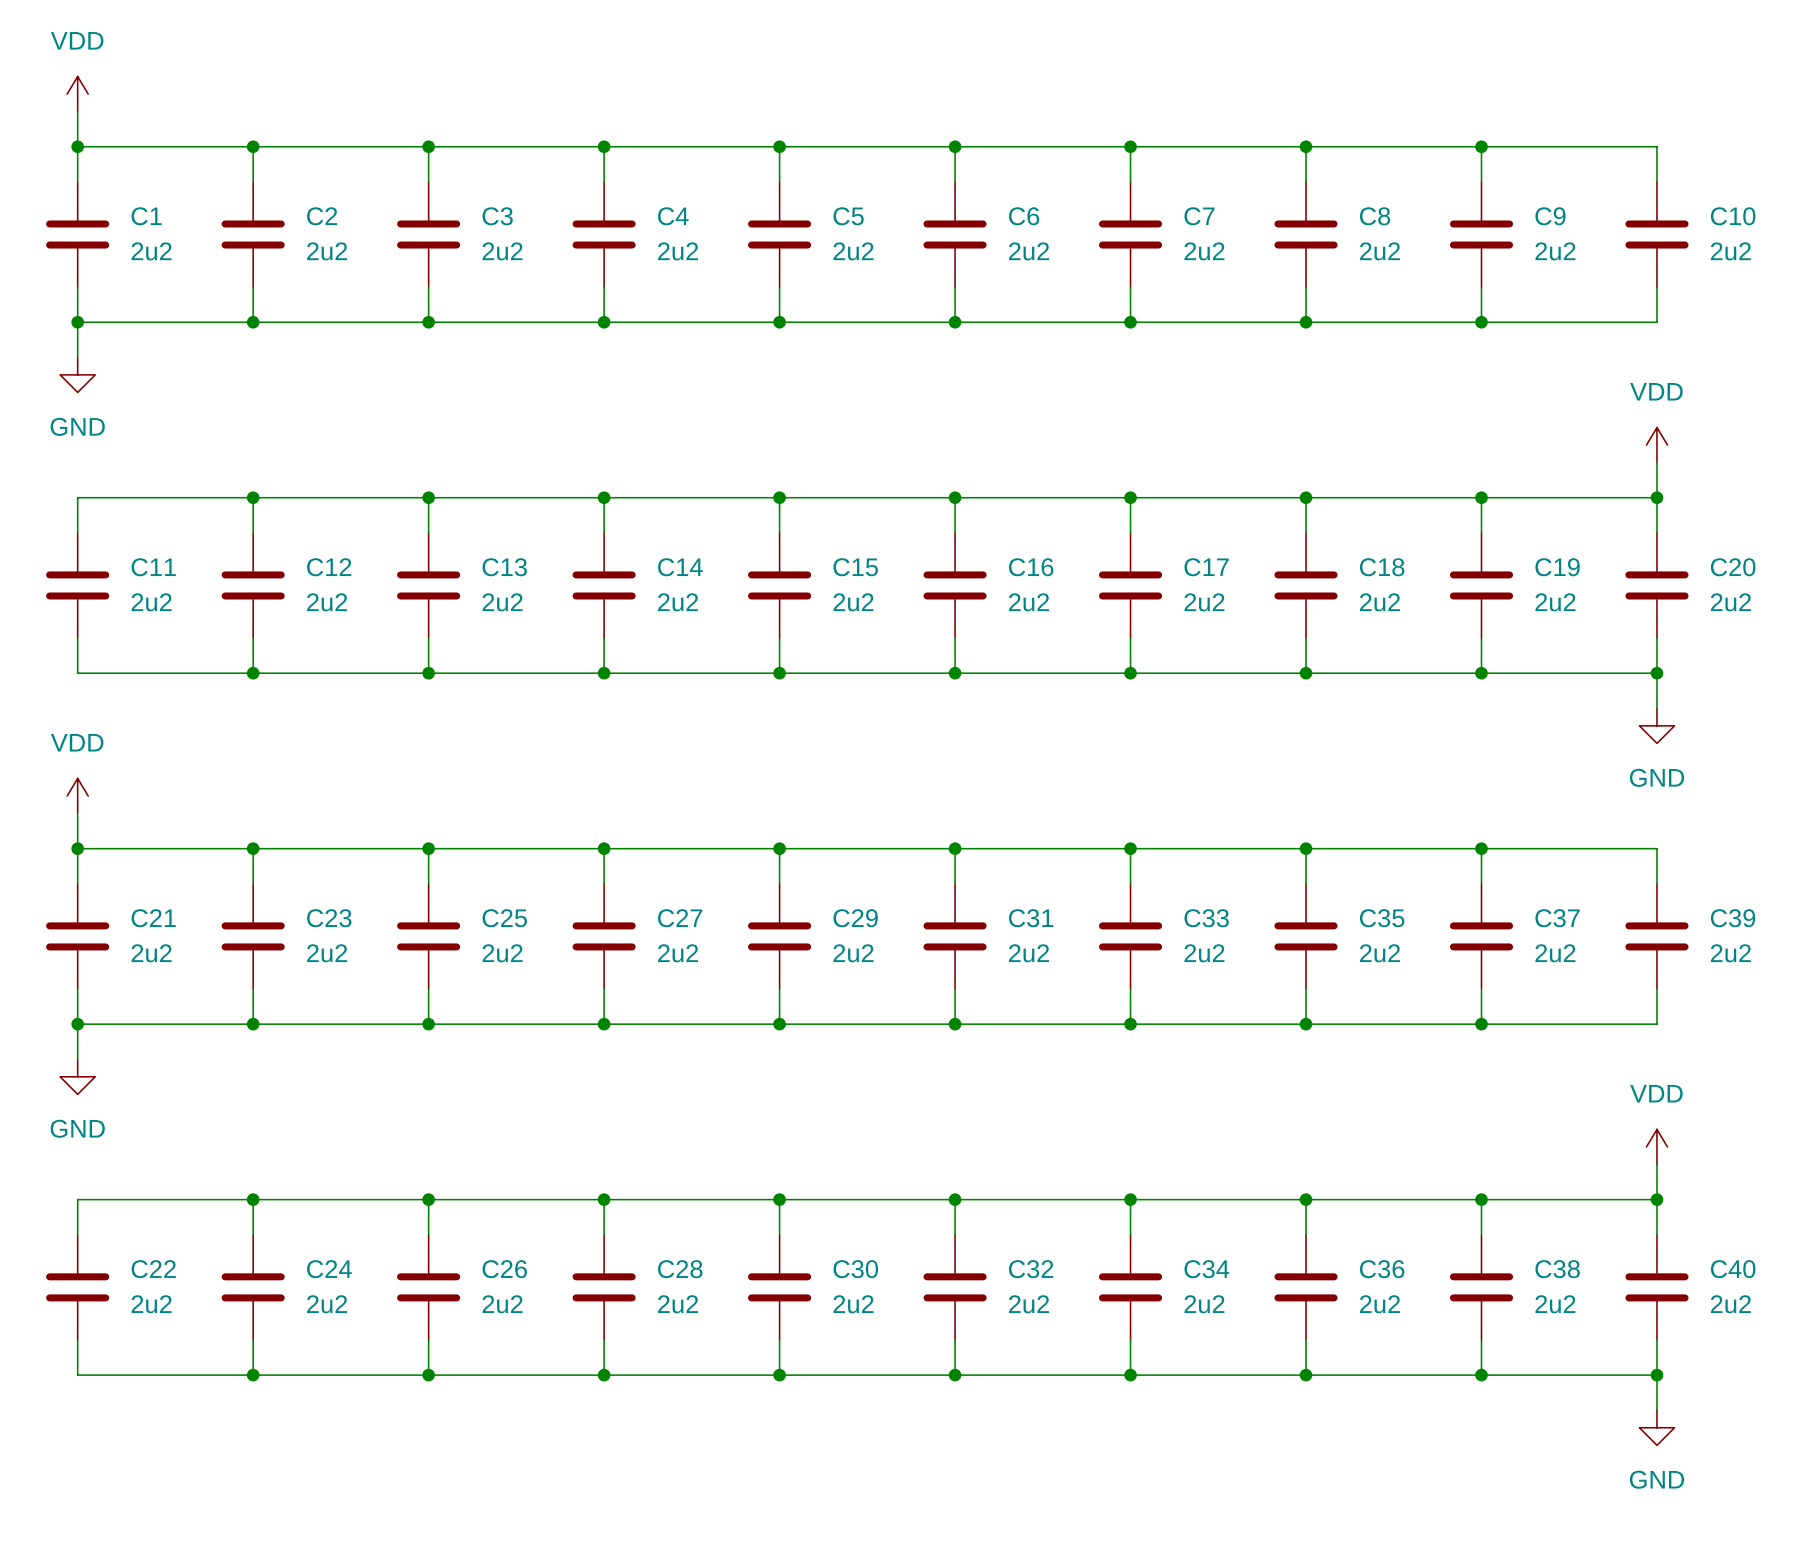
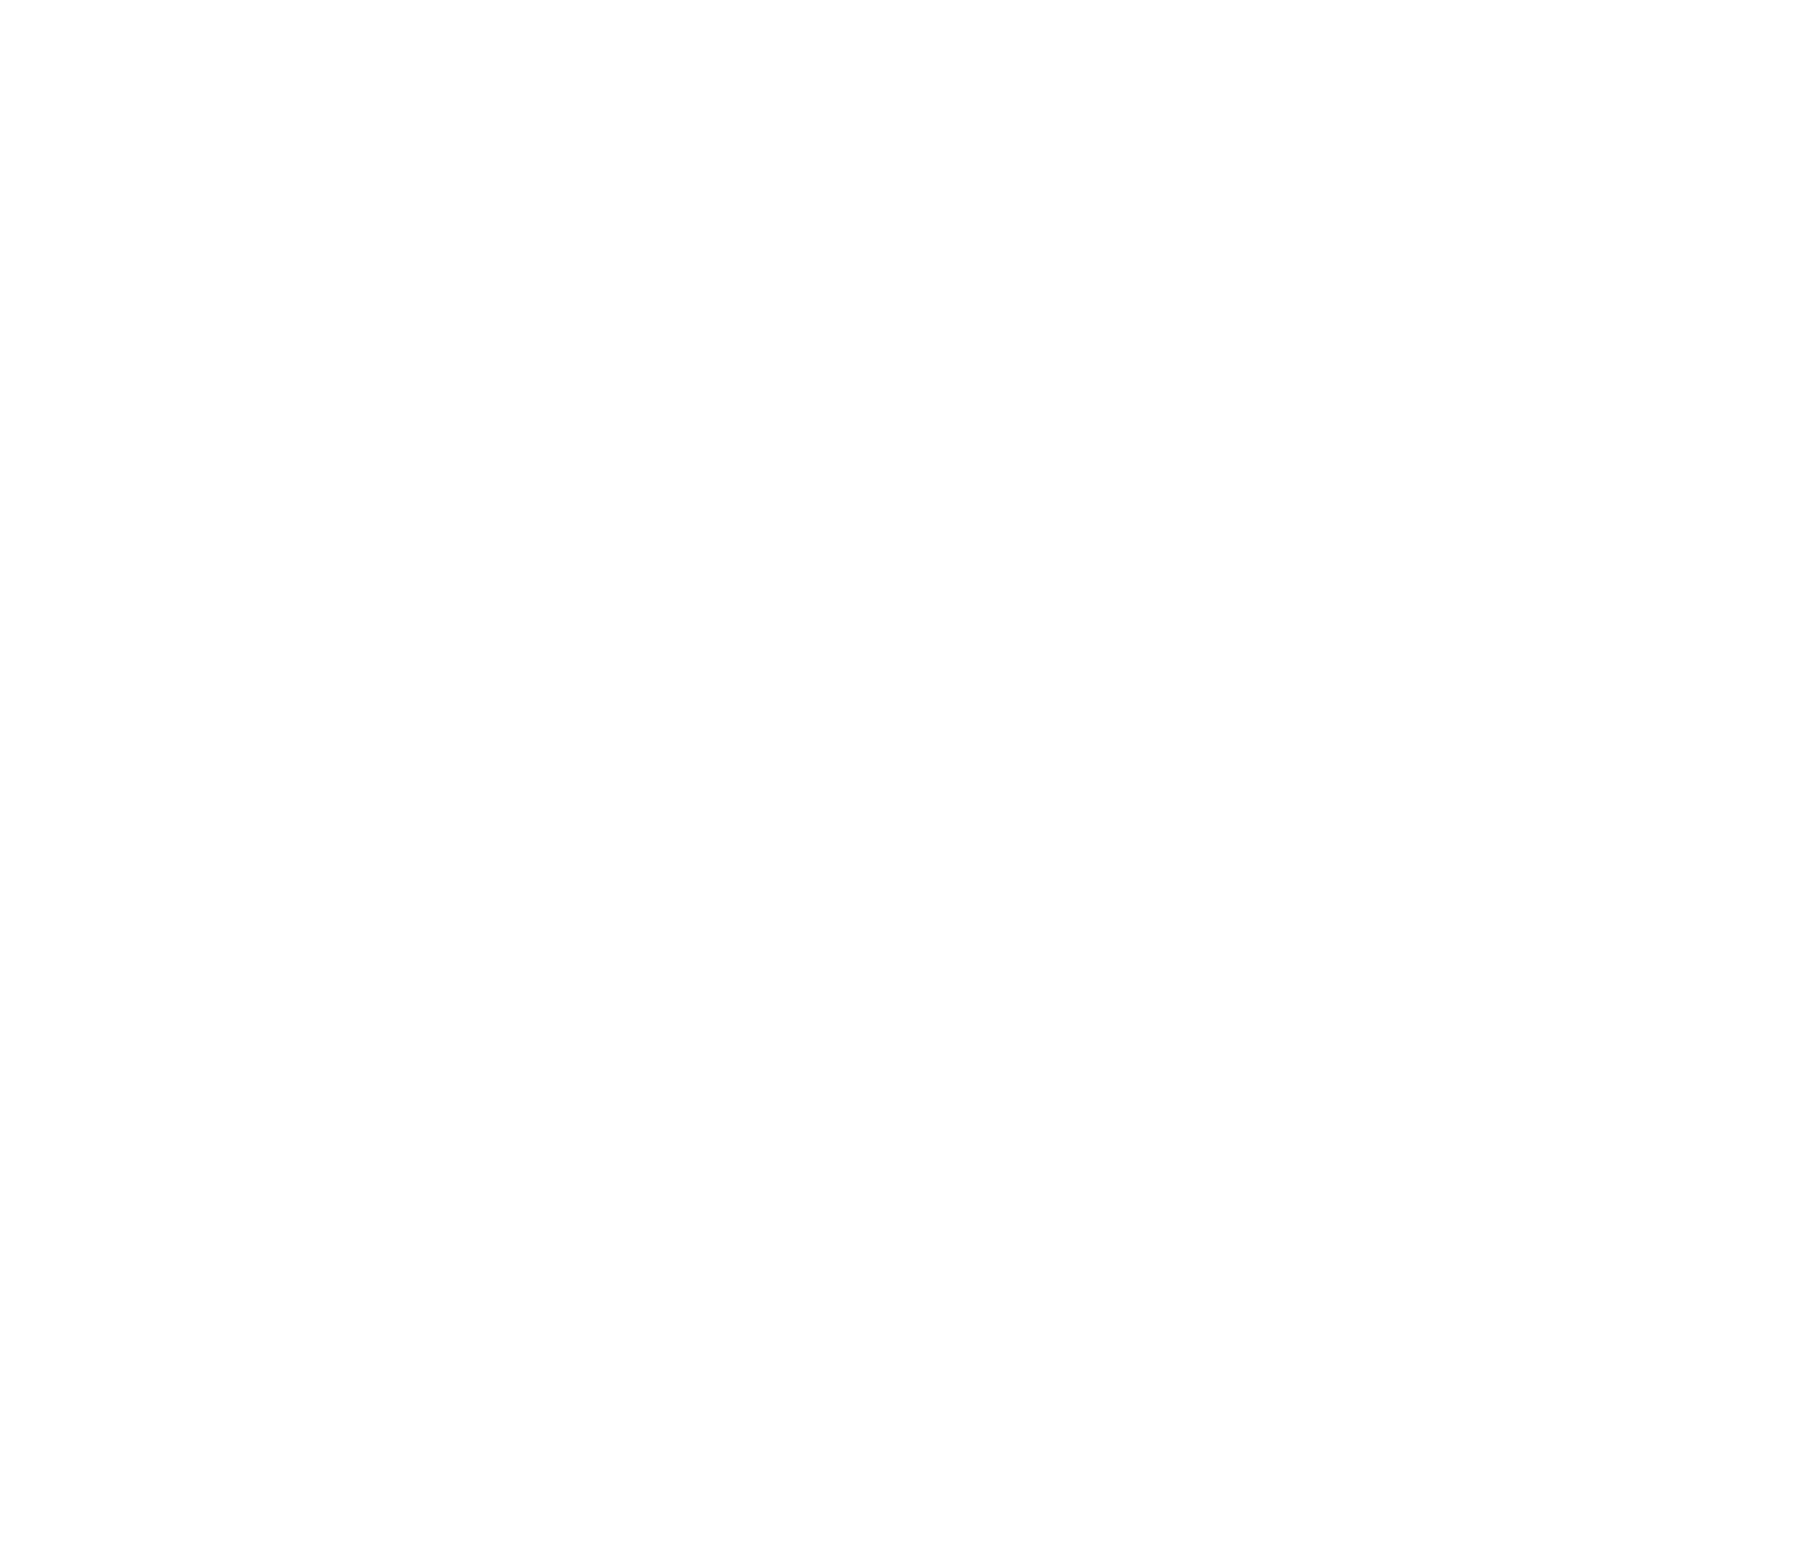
power symbol: VDD (77, 94) -> none
wire: (77, 111) (77, 181) -> none
wire: (77, 146) (1656, 146) (1656, 181) -> none
junction: (77, 146) -> none
wire: (253, 146) (253, 181) -> none
junction: (253, 146) -> none
wire: (428, 146) (428, 181) -> none
junction: (428, 146) -> none
wire: (604, 146) (604, 181) -> none
junction: (604, 146) -> none
wire: (779, 146) (779, 181) -> none
junction: (779, 146) -> none
wire: (955, 146) (955, 181) -> none
junction: (955, 146) -> none
wire: (1130, 146) (1130, 181) -> none
junction: (1130, 146) -> none
wire: (1306, 146) (1306, 181) -> none
junction: (1306, 146) -> none
wire: (1481, 146) (1481, 181) -> none
junction: (1481, 146) -> none
C1: 2u2 (77, 234) -> none
C2: 2u2 (253, 234) -> none
C3: 2u2 (428, 234) -> none
C4: 2u2 (604, 234) -> none
C5: 2u2 (779, 234) -> none
C6: 2u2 (955, 234) -> none
C7: 2u2 (1130, 234) -> none
C8: 2u2 (1306, 234) -> none
C9: 2u2 (1481, 234) -> none
C10: 2u2 (1656, 234) -> none
wire: (77, 287) (77, 357) -> none
wire: (253, 287) (253, 322) -> none
wire: (428, 287) (428, 322) -> none
wire: (604, 287) (604, 322) -> none
wire: (779, 287) (779, 322) -> none
wire: (955, 287) (955, 322) -> none
wire: (1130, 287) (1130, 322) -> none
wire: (1306, 287) (1306, 322) -> none
wire: (1481, 287) (1481, 322) -> none
wire: (1656, 287) (1656, 322) (77, 322) -> none
junction: (77, 322) -> none
junction: (253, 322) -> none
junction: (428, 322) -> none
junction: (604, 322) -> none
junction: (779, 322) -> none
junction: (955, 322) -> none
junction: (1130, 322) -> none
junction: (1306, 322) -> none
junction: (1481, 322) -> none
power symbol: GND (77, 374) -> none
power symbol: VDD (1656, 445) -> none
wire: (1656, 462) (1656, 532) -> none
wire: (253, 497) (253, 532) -> none
junction: (253, 497) -> none
wire: (428, 497) (428, 532) -> none
junction: (428, 497) -> none
wire: (604, 497) (604, 532) -> none
junction: (604, 497) -> none
wire: (779, 497) (779, 532) -> none
junction: (779, 497) -> none
wire: (955, 497) (955, 532) -> none
junction: (955, 497) -> none
wire: (1130, 497) (1130, 532) -> none
junction: (1130, 497) -> none
wire: (1306, 497) (1306, 532) -> none
junction: (1306, 497) -> none
wire: (1481, 497) (1481, 532) -> none
junction: (1481, 497) -> none
wire: (1656, 497) (77, 497) (77, 532) -> none
junction: (1656, 497) -> none
C11: 2u2 (77, 585) -> none
C12: 2u2 (253, 585) -> none
C13: 2u2 (428, 585) -> none
C14: 2u2 (604, 585) -> none
C15: 2u2 (779, 585) -> none
C16: 2u2 (955, 585) -> none
C17: 2u2 (1130, 585) -> none
C18: 2u2 (1306, 585) -> none
C19: 2u2 (1481, 585) -> none
C20: 2u2 (1656, 585) -> none
wire: (77, 638) (77, 673) (1656, 673) -> none
wire: (253, 638) (253, 673) -> none
wire: (428, 638) (428, 673) -> none
wire: (604, 638) (604, 673) -> none
wire: (779, 638) (779, 673) -> none
wire: (955, 638) (955, 673) -> none
wire: (1130, 638) (1130, 673) -> none
wire: (1306, 638) (1306, 673) -> none
wire: (1481, 638) (1481, 673) -> none
wire: (1656, 638) (1656, 708) -> none
junction: (253, 673) -> none
junction: (428, 673) -> none
junction: (604, 673) -> none
junction: (779, 673) -> none
junction: (955, 673) -> none
junction: (1130, 673) -> none
junction: (1306, 673) -> none
junction: (1481, 673) -> none
junction: (1656, 673) -> none
power symbol: GND (1656, 725) -> none
power symbol: VDD (77, 796) -> none
wire: (77, 813) (77, 883) -> none
wire: (77, 848) (1656, 848) (1656, 883) -> none
junction: (77, 848) -> none
wire: (253, 848) (253, 883) -> none
junction: (253, 848) -> none
wire: (428, 848) (428, 883) -> none
junction: (428, 848) -> none
wire: (604, 848) (604, 883) -> none
junction: (604, 848) -> none
wire: (779, 848) (779, 883) -> none
junction: (779, 848) -> none
wire: (955, 848) (955, 883) -> none
junction: (955, 848) -> none
wire: (1130, 848) (1130, 883) -> none
junction: (1130, 848) -> none
wire: (1306, 848) (1306, 883) -> none
junction: (1306, 848) -> none
wire: (1481, 848) (1481, 883) -> none
junction: (1481, 848) -> none
C21: 2u2 (77, 936) -> none
C23: 2u2 (253, 936) -> none
C25: 2u2 (428, 936) -> none
C27: 2u2 (604, 936) -> none
C29: 2u2 (779, 936) -> none
C31: 2u2 (955, 936) -> none
C33: 2u2 (1130, 936) -> none
C35: 2u2 (1306, 936) -> none
C37: 2u2 (1481, 936) -> none
C39: 2u2 (1656, 936) -> none
wire: (77, 989) (77, 1059) -> none
wire: (253, 989) (253, 1024) -> none
wire: (428, 989) (428, 1024) -> none
wire: (604, 989) (604, 1024) -> none
wire: (779, 989) (779, 1024) -> none
wire: (955, 989) (955, 1024) -> none
wire: (1130, 989) (1130, 1024) -> none
wire: (1306, 989) (1306, 1024) -> none
wire: (1481, 989) (1481, 1024) -> none
wire: (1656, 989) (1656, 1024) (77, 1024) -> none
junction: (77, 1024) -> none
junction: (253, 1024) -> none
junction: (428, 1024) -> none
junction: (604, 1024) -> none
junction: (779, 1024) -> none
junction: (955, 1024) -> none
junction: (1130, 1024) -> none
junction: (1306, 1024) -> none
junction: (1481, 1024) -> none
power symbol: GND (77, 1076) -> none
power symbol: VDD (1656, 1146) -> none
wire: (1656, 1164) (1656, 1234) -> none
wire: (253, 1199) (253, 1234) -> none
junction: (253, 1199) -> none
wire: (428, 1199) (428, 1234) -> none
junction: (428, 1199) -> none
wire: (604, 1199) (604, 1234) -> none
junction: (604, 1199) -> none
wire: (779, 1199) (779, 1234) -> none
junction: (779, 1199) -> none
wire: (955, 1199) (955, 1234) -> none
junction: (955, 1199) -> none
wire: (1130, 1199) (1130, 1234) -> none
junction: (1130, 1199) -> none
wire: (1306, 1199) (1306, 1234) -> none
junction: (1306, 1199) -> none
wire: (1481, 1199) (1481, 1234) -> none
junction: (1481, 1199) -> none
wire: (1656, 1199) (77, 1199) (77, 1234) -> none
junction: (1656, 1199) -> none
C22: 2u2 (77, 1287) -> none
C24: 2u2 (253, 1287) -> none
C26: 2u2 (428, 1287) -> none
C28: 2u2 (604, 1287) -> none
C30: 2u2 (779, 1287) -> none
C32: 2u2 (955, 1287) -> none
C34: 2u2 (1130, 1287) -> none
C36: 2u2 (1306, 1287) -> none
C38: 2u2 (1481, 1287) -> none
C40: 2u2 (1656, 1287) -> none
wire: (77, 1340) (77, 1375) (1656, 1375) -> none
wire: (253, 1340) (253, 1375) -> none
wire: (428, 1340) (428, 1375) -> none
wire: (604, 1340) (604, 1375) -> none
wire: (779, 1340) (779, 1375) -> none
wire: (955, 1340) (955, 1375) -> none
wire: (1130, 1340) (1130, 1375) -> none
wire: (1306, 1340) (1306, 1375) -> none
wire: (1481, 1340) (1481, 1375) -> none
wire: (1656, 1340) (1656, 1410) -> none
junction: (253, 1375) -> none
junction: (428, 1375) -> none
junction: (604, 1375) -> none
junction: (779, 1375) -> none
junction: (955, 1375) -> none
junction: (1130, 1375) -> none
junction: (1306, 1375) -> none
junction: (1481, 1375) -> none
junction: (1656, 1375) -> none
power symbol: GND (1656, 1427) -> none

